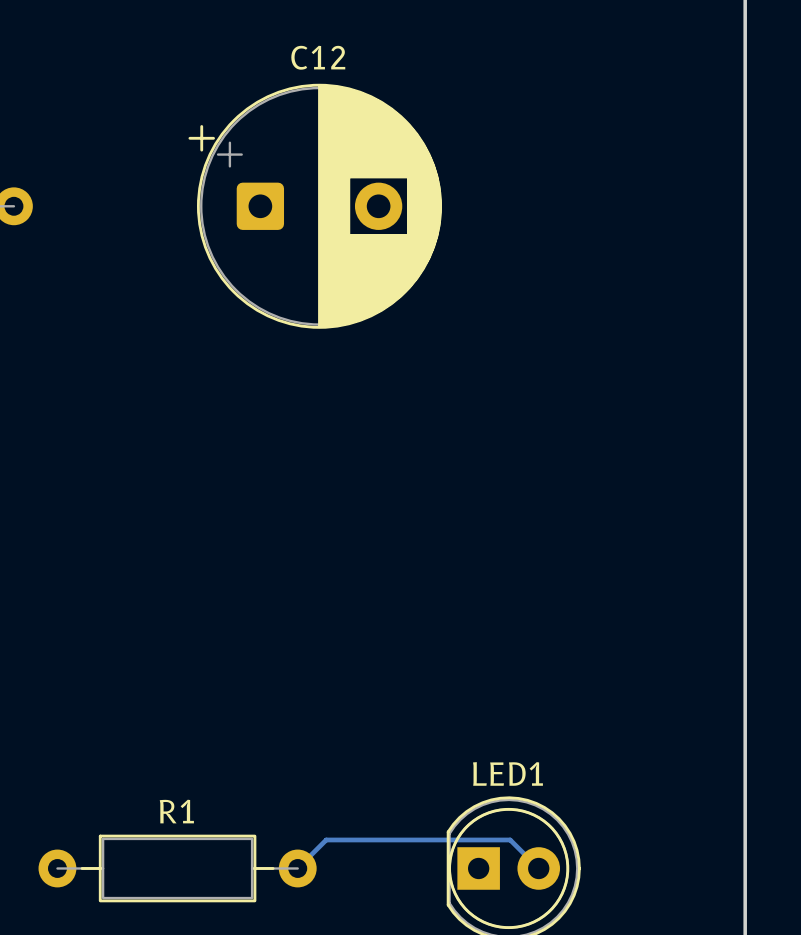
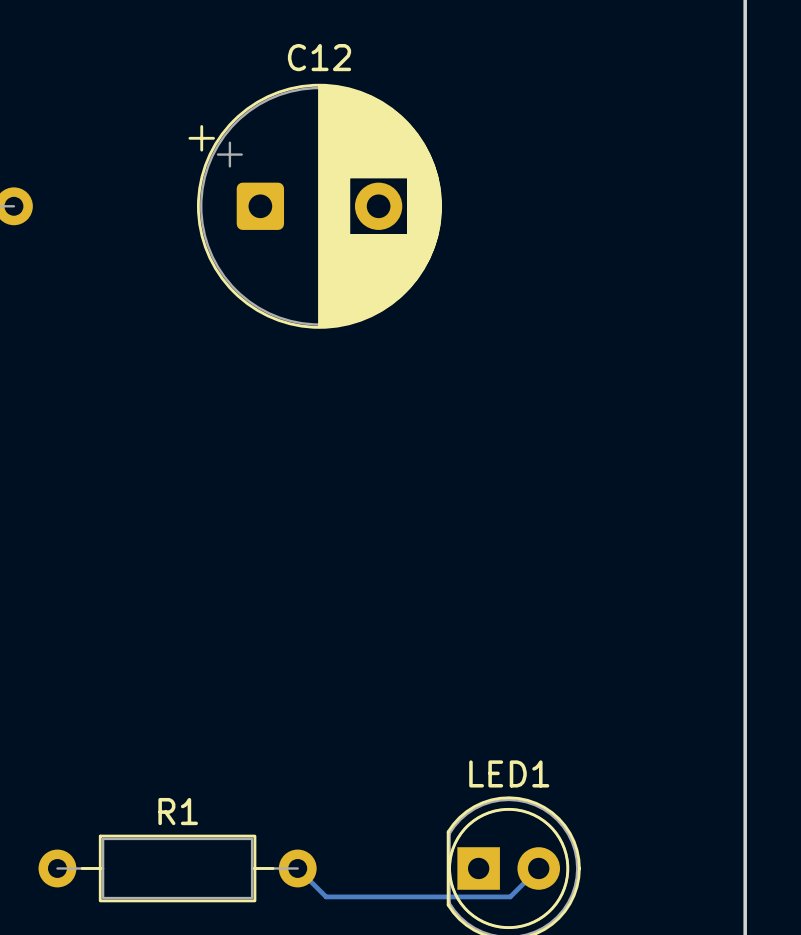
bottom track: (297, 868) (326, 839) (510, 839) (538, 868) -> (297, 868) (326, 896) (510, 896) (538, 868)

